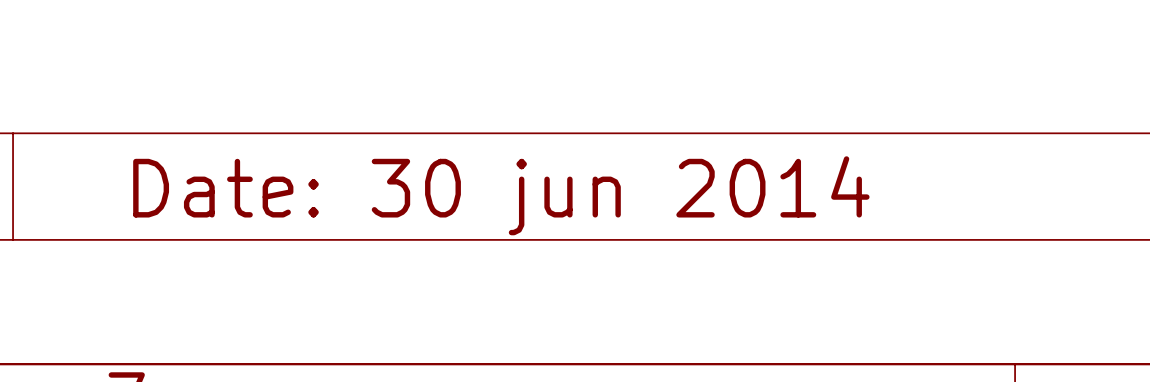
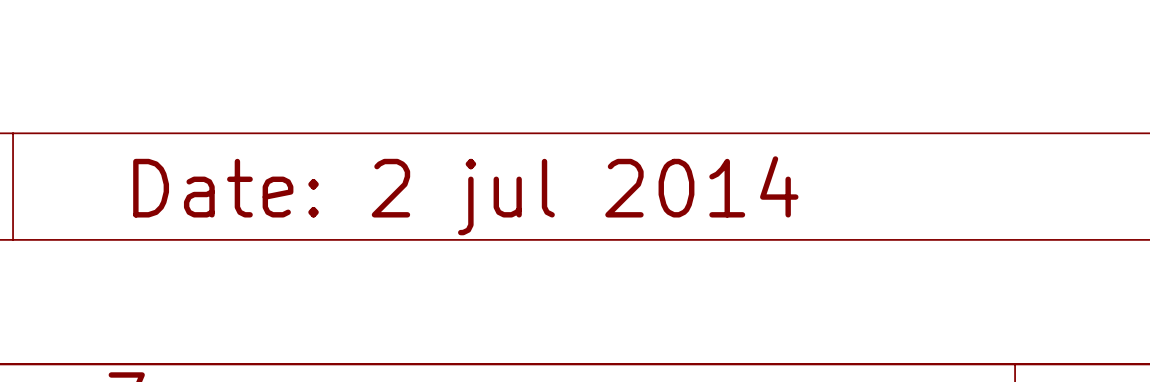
title block: Date: 30 jun 2014 (501, 195) -> Date: 2 jul 2014 (465, 195)

